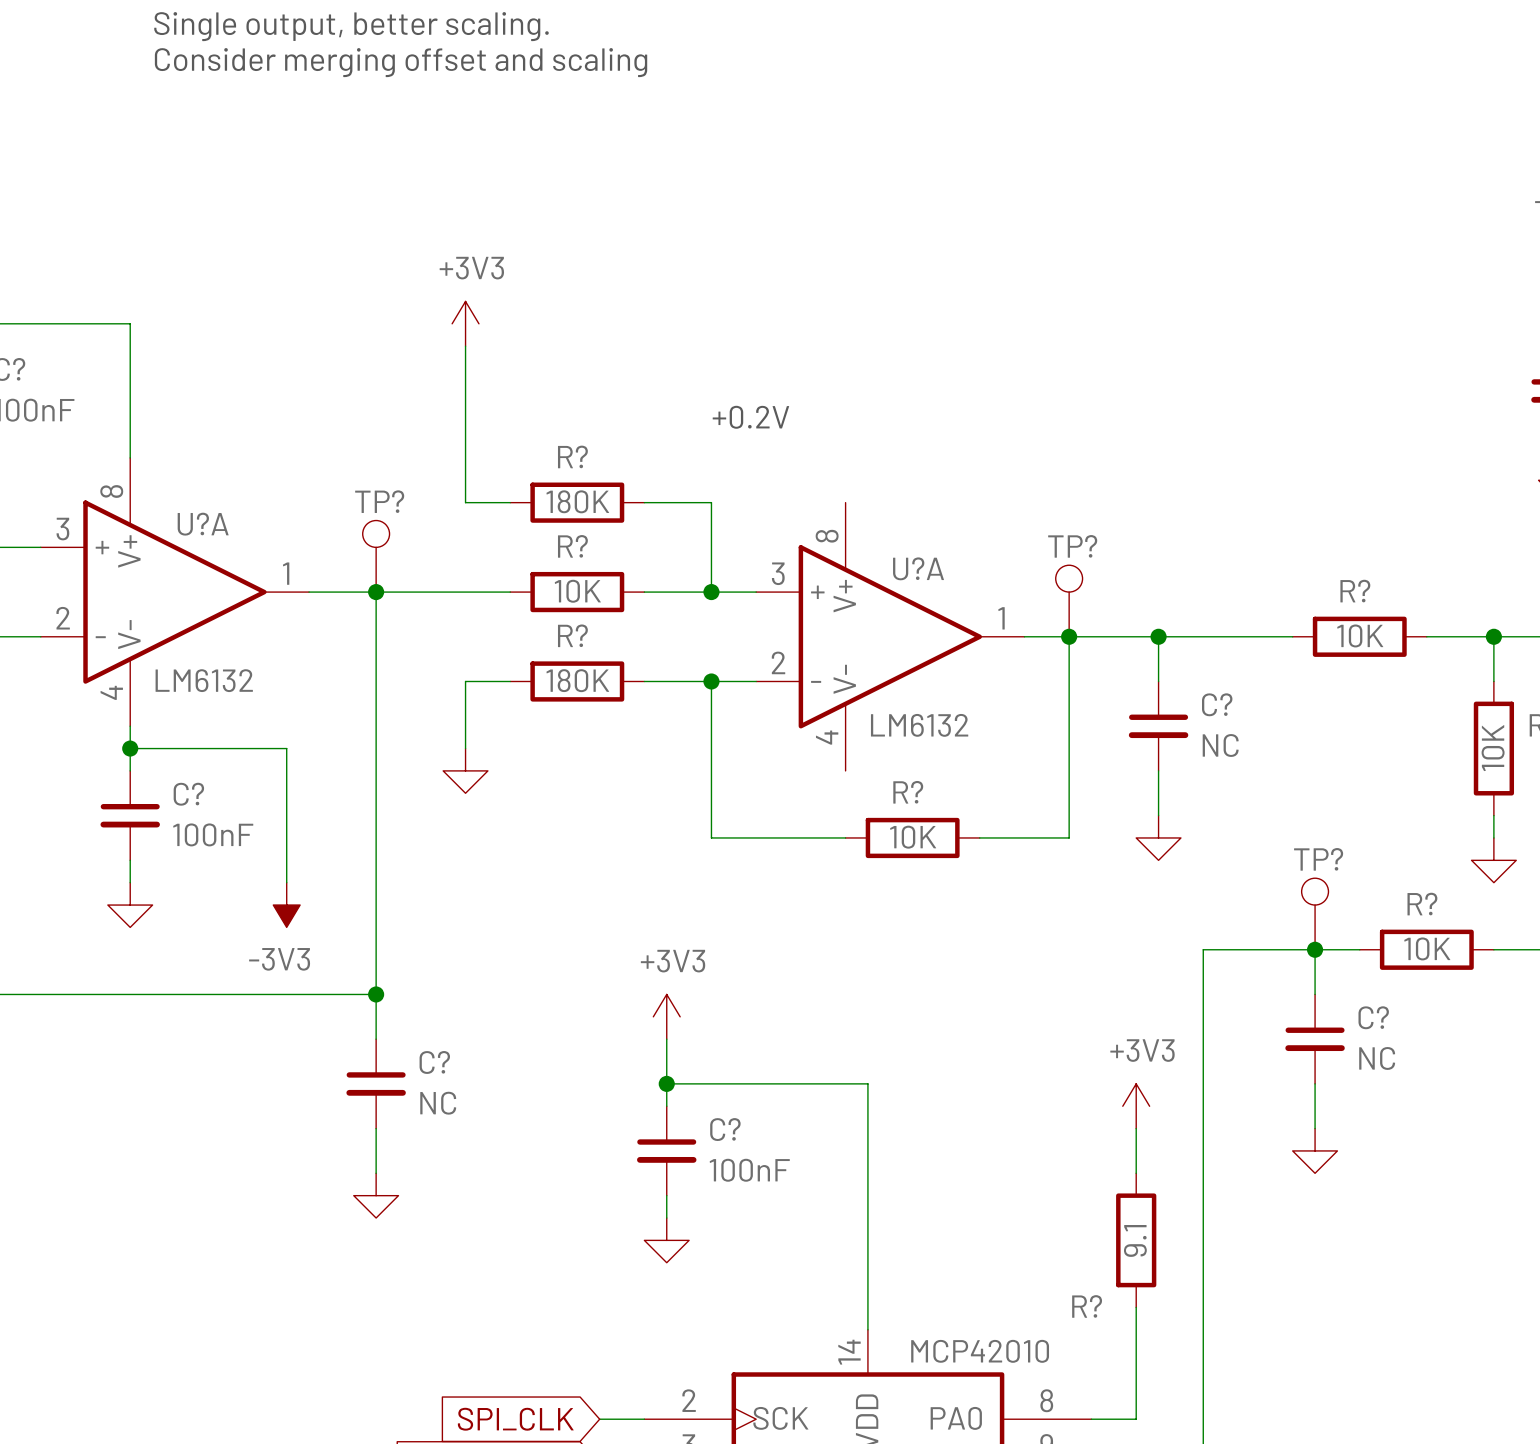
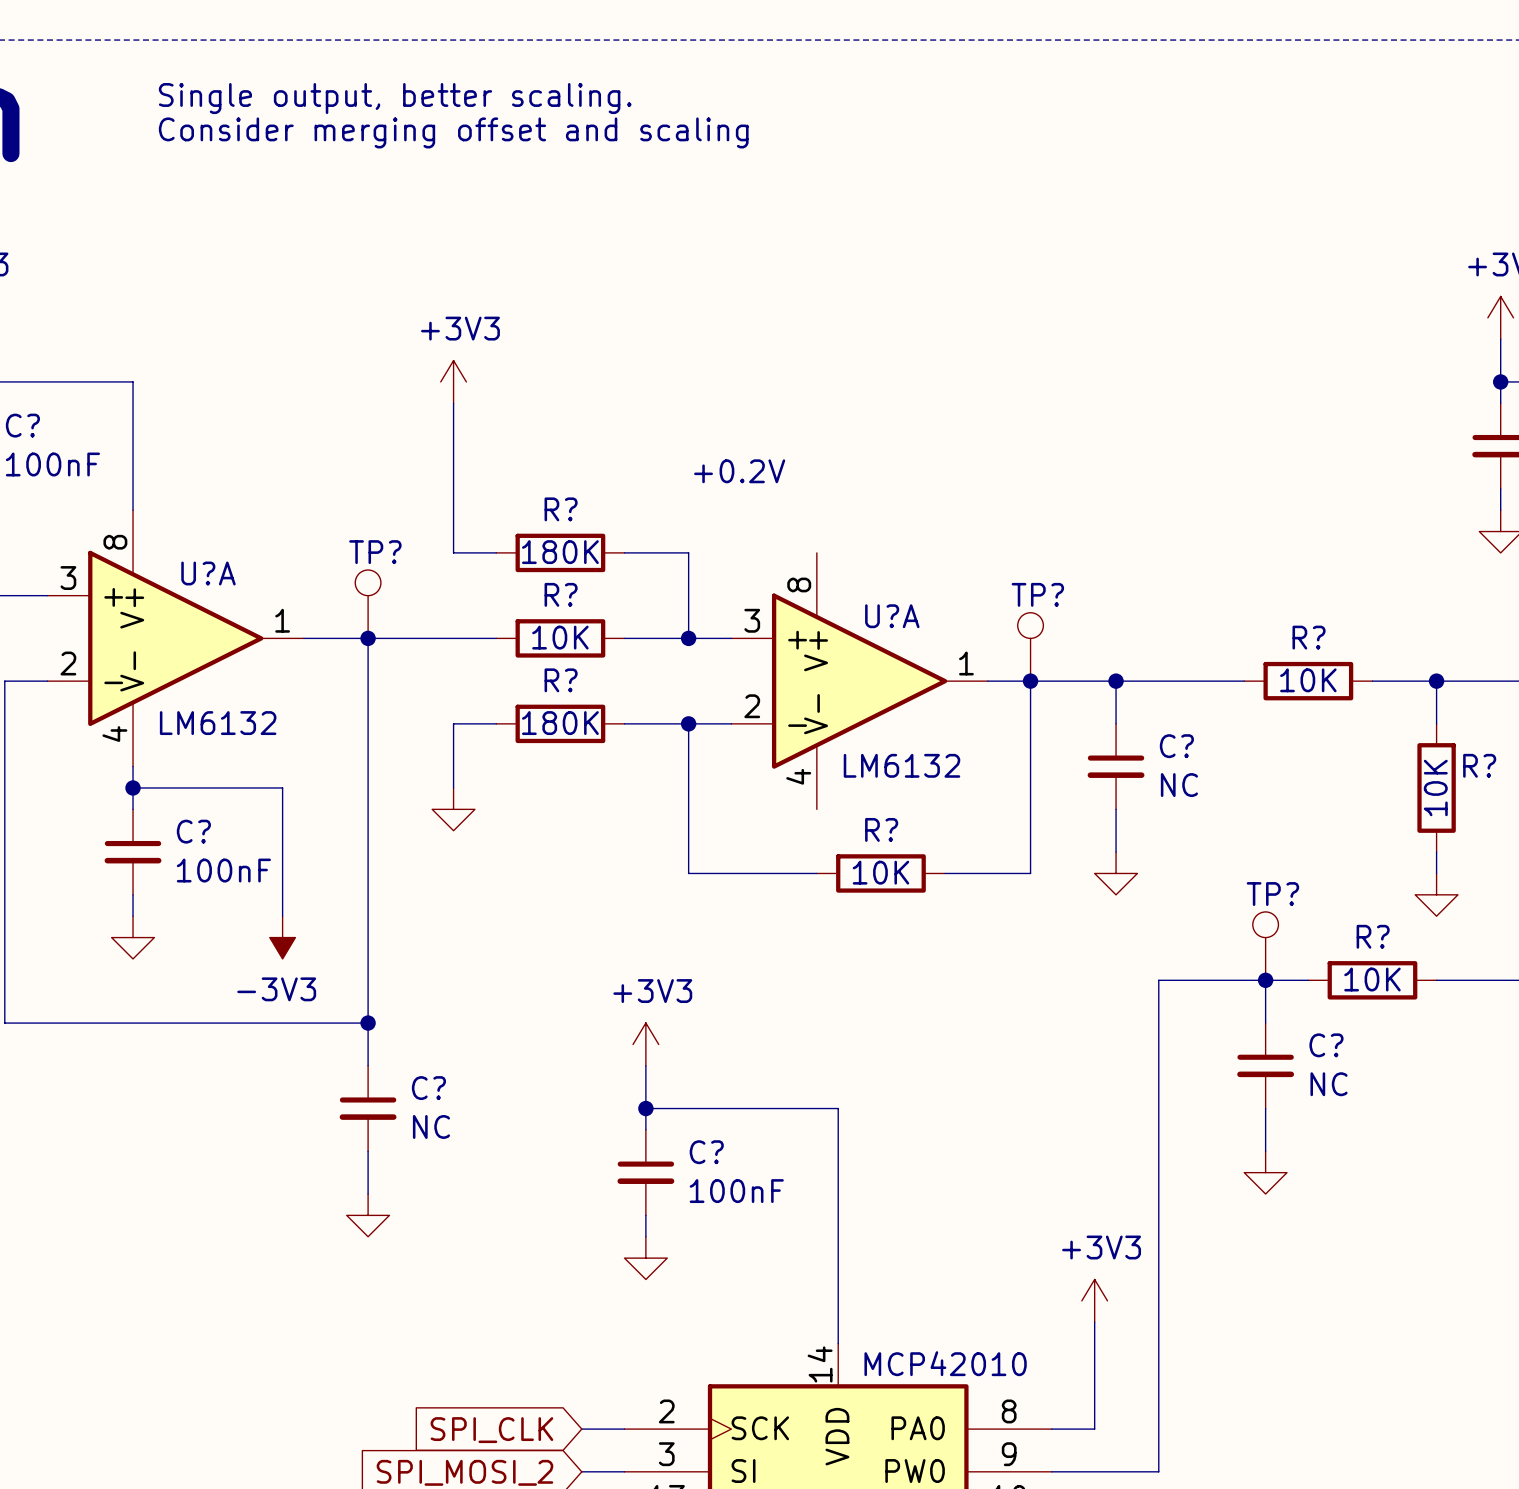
power symbol position: +3V3 (1136, 1106) -> +3V3 (1094, 1300)
wire: (1136, 1128) (1136, 1173) -> none
R?: 9.1 (1136, 1240) -> none

